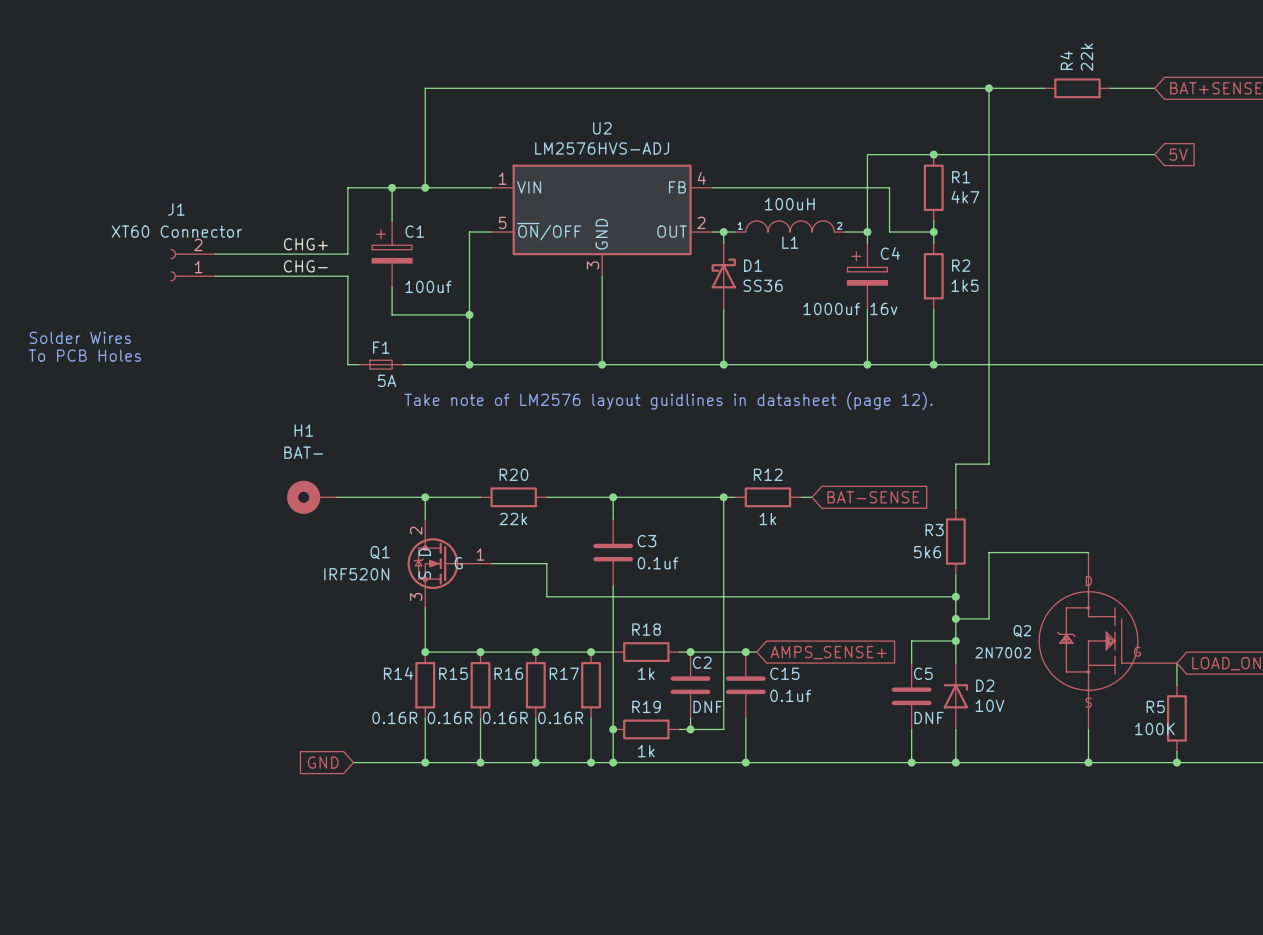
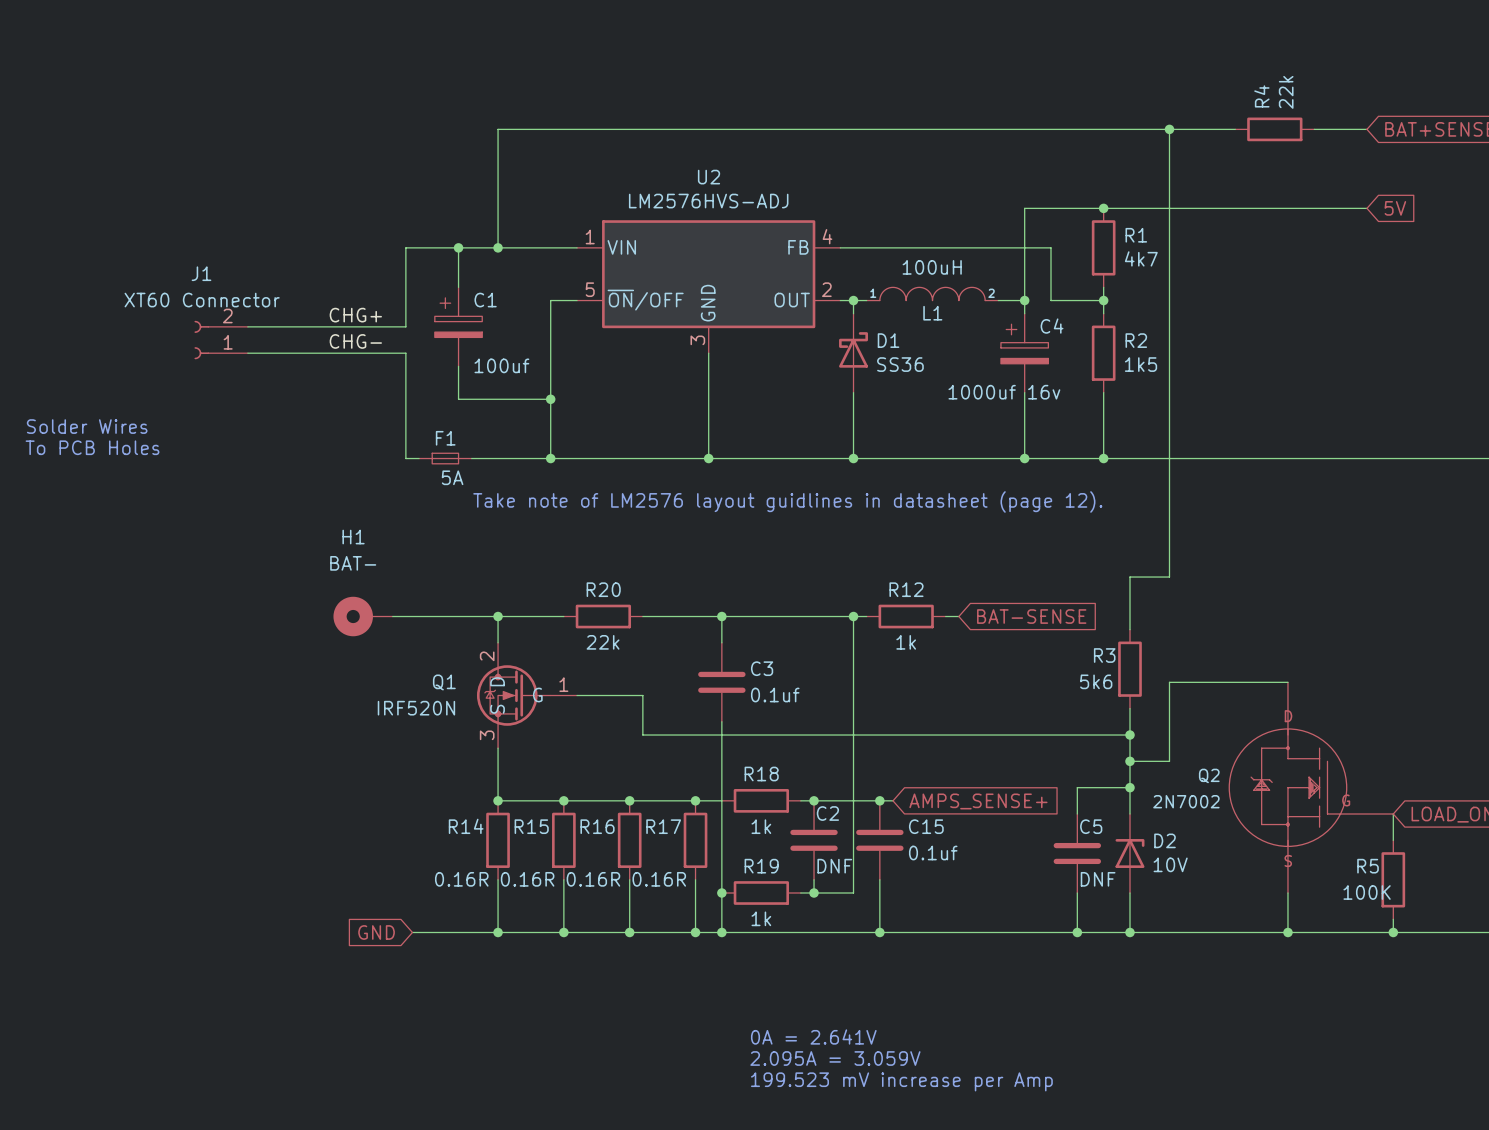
text: none -> 0A = 2.641V (813, 1036)
text: none -> 2.095A = 3.059V (835, 1058)
text: none -> 199.523 mV increase per Amp (901, 1081)

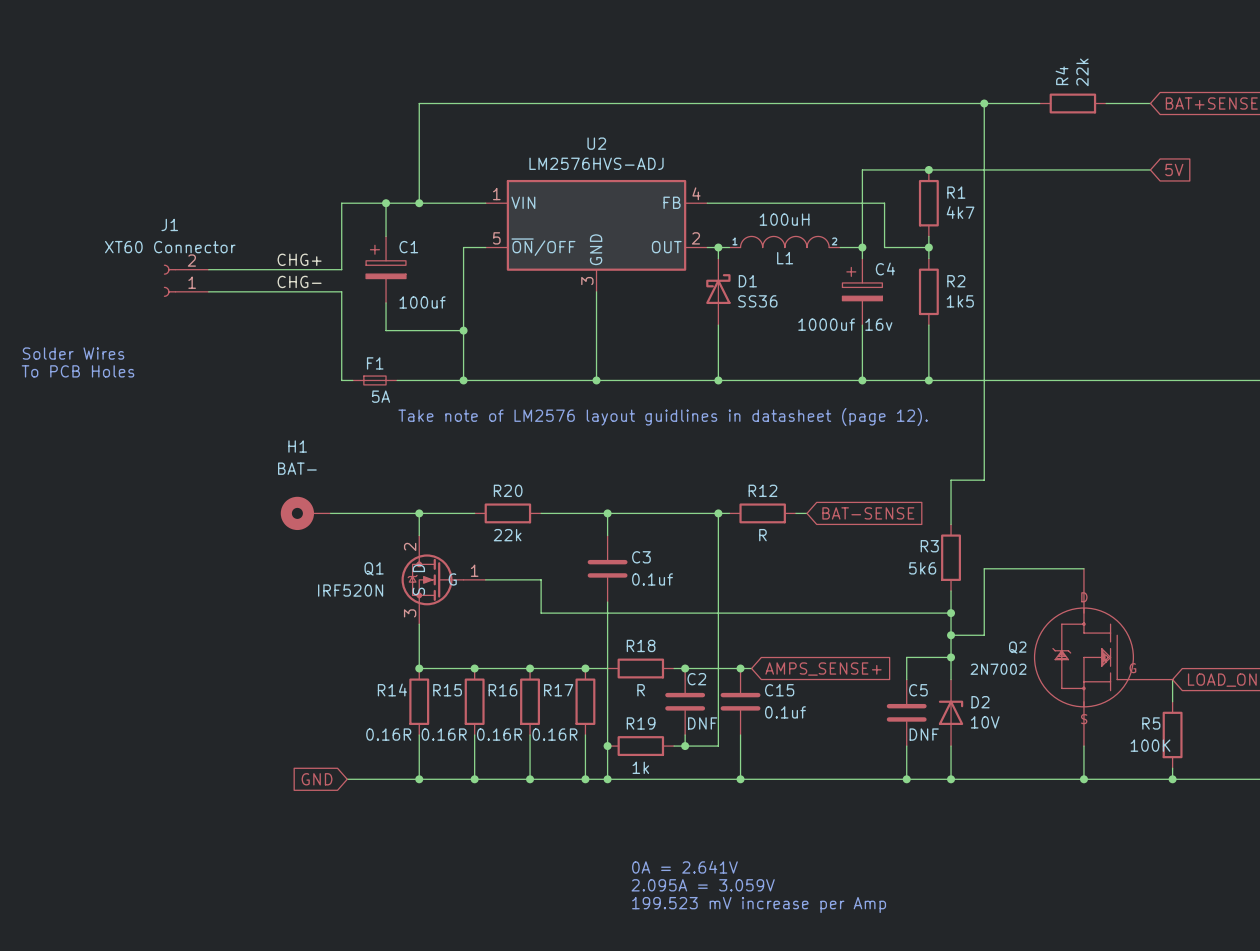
R12 value: 1k (906, 642) -> R (762, 535)
R18 value: 1k (761, 826) -> R (641, 690)

